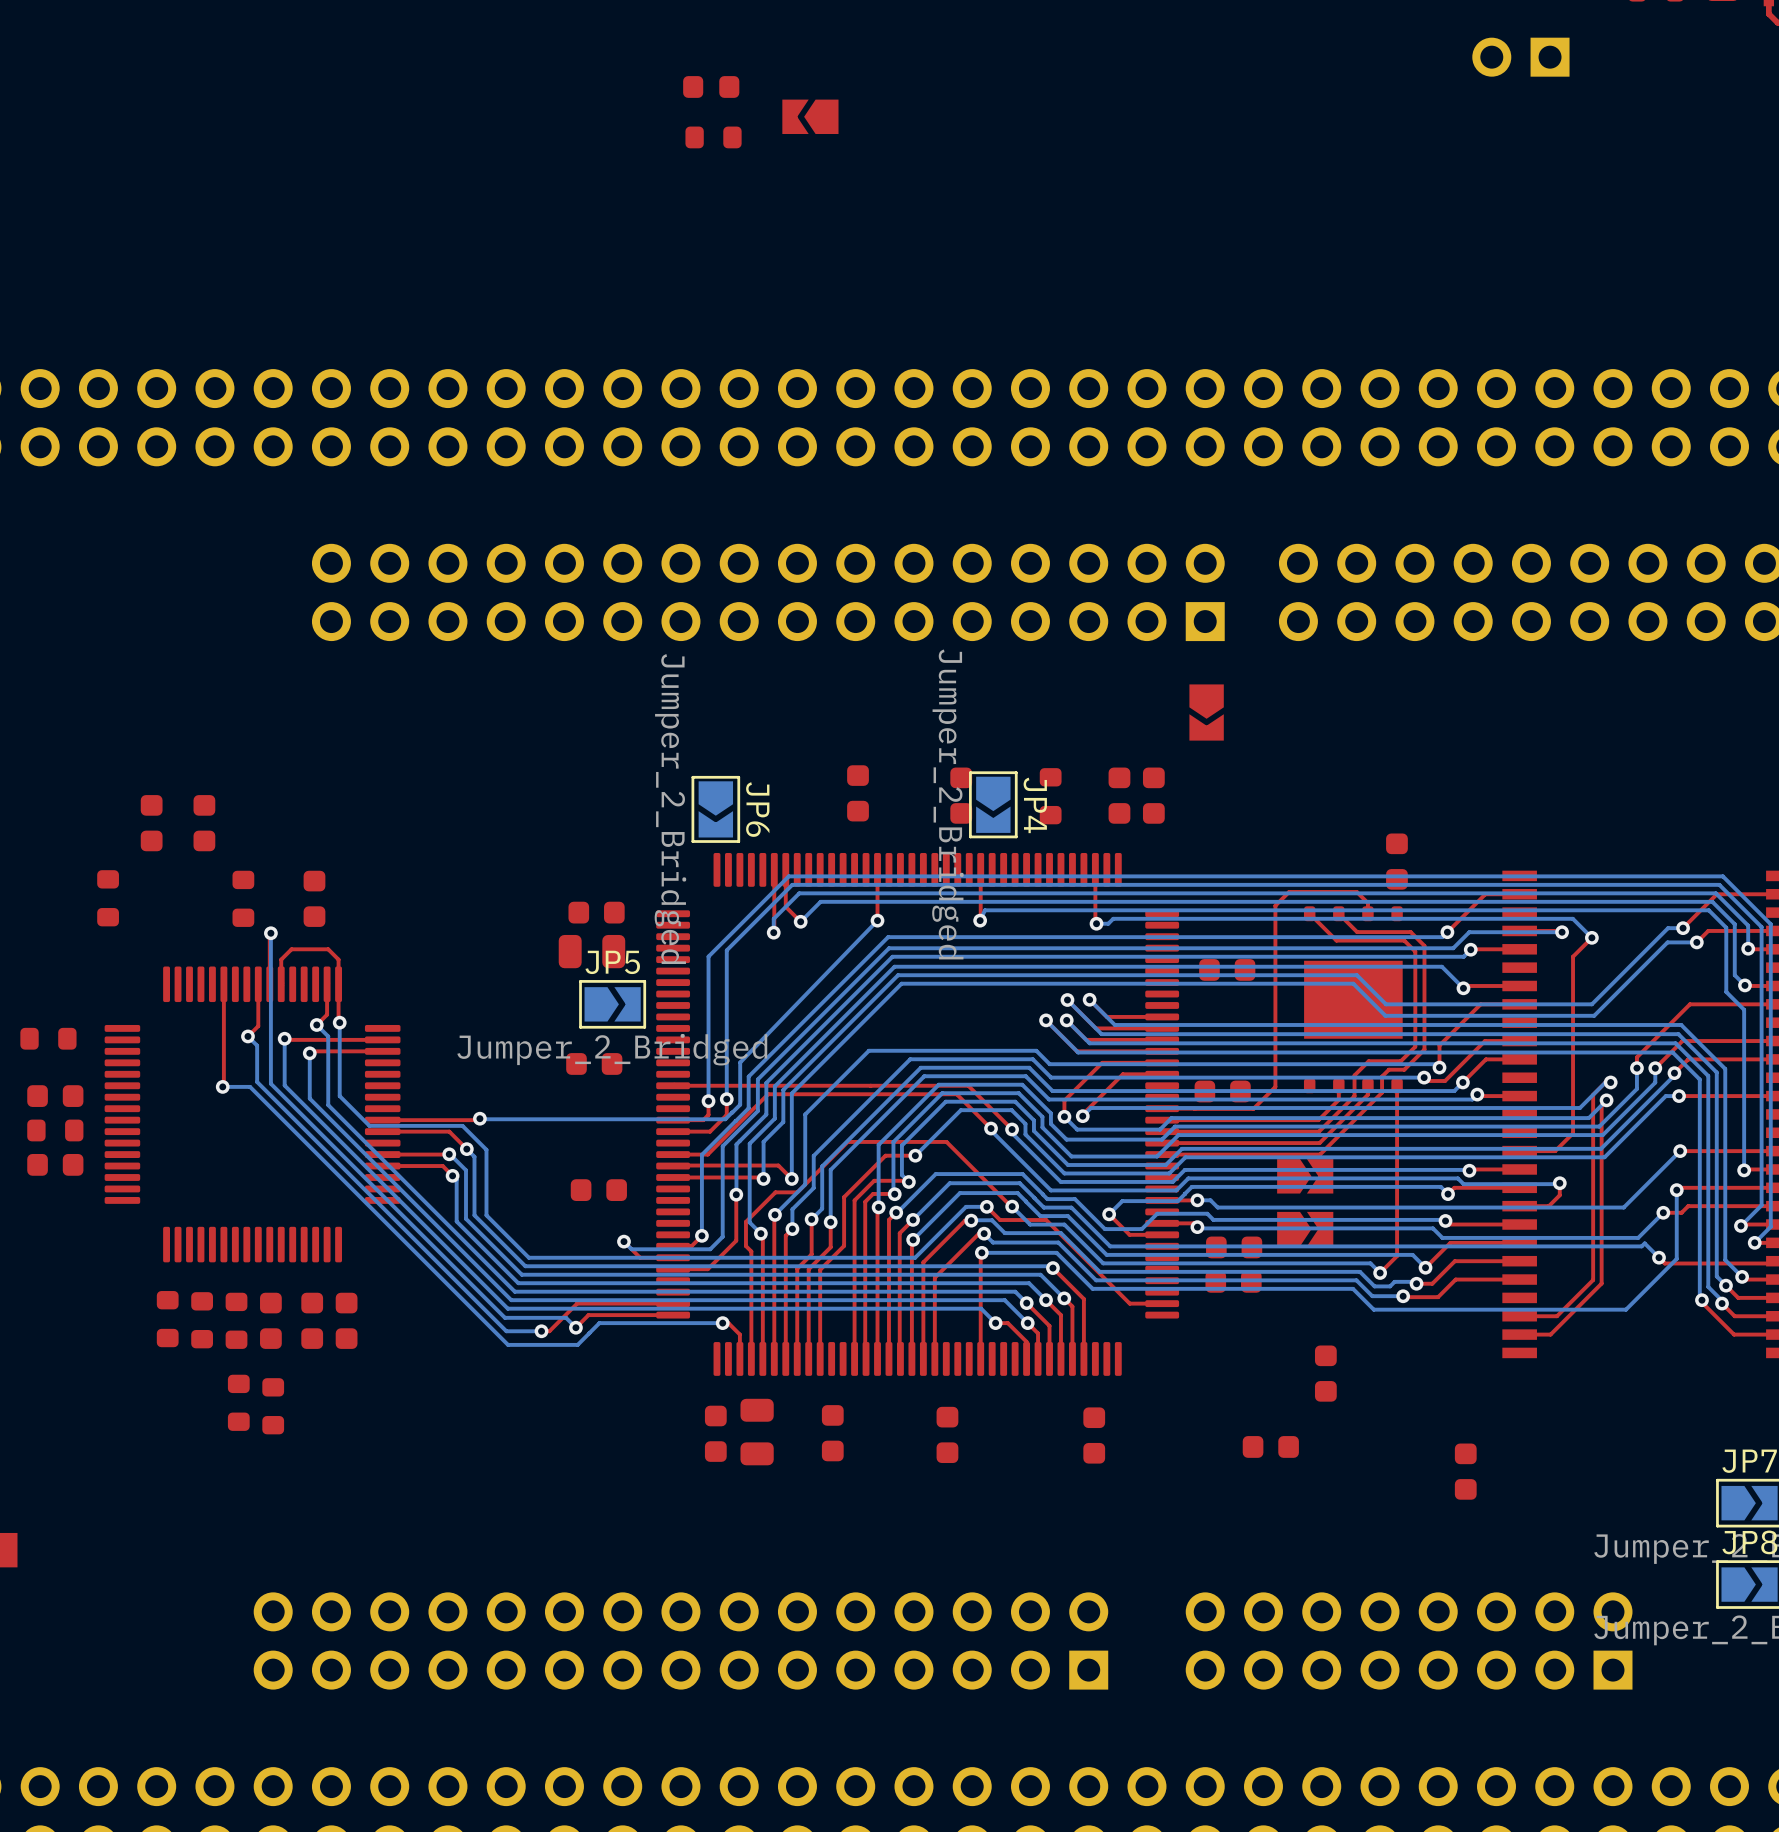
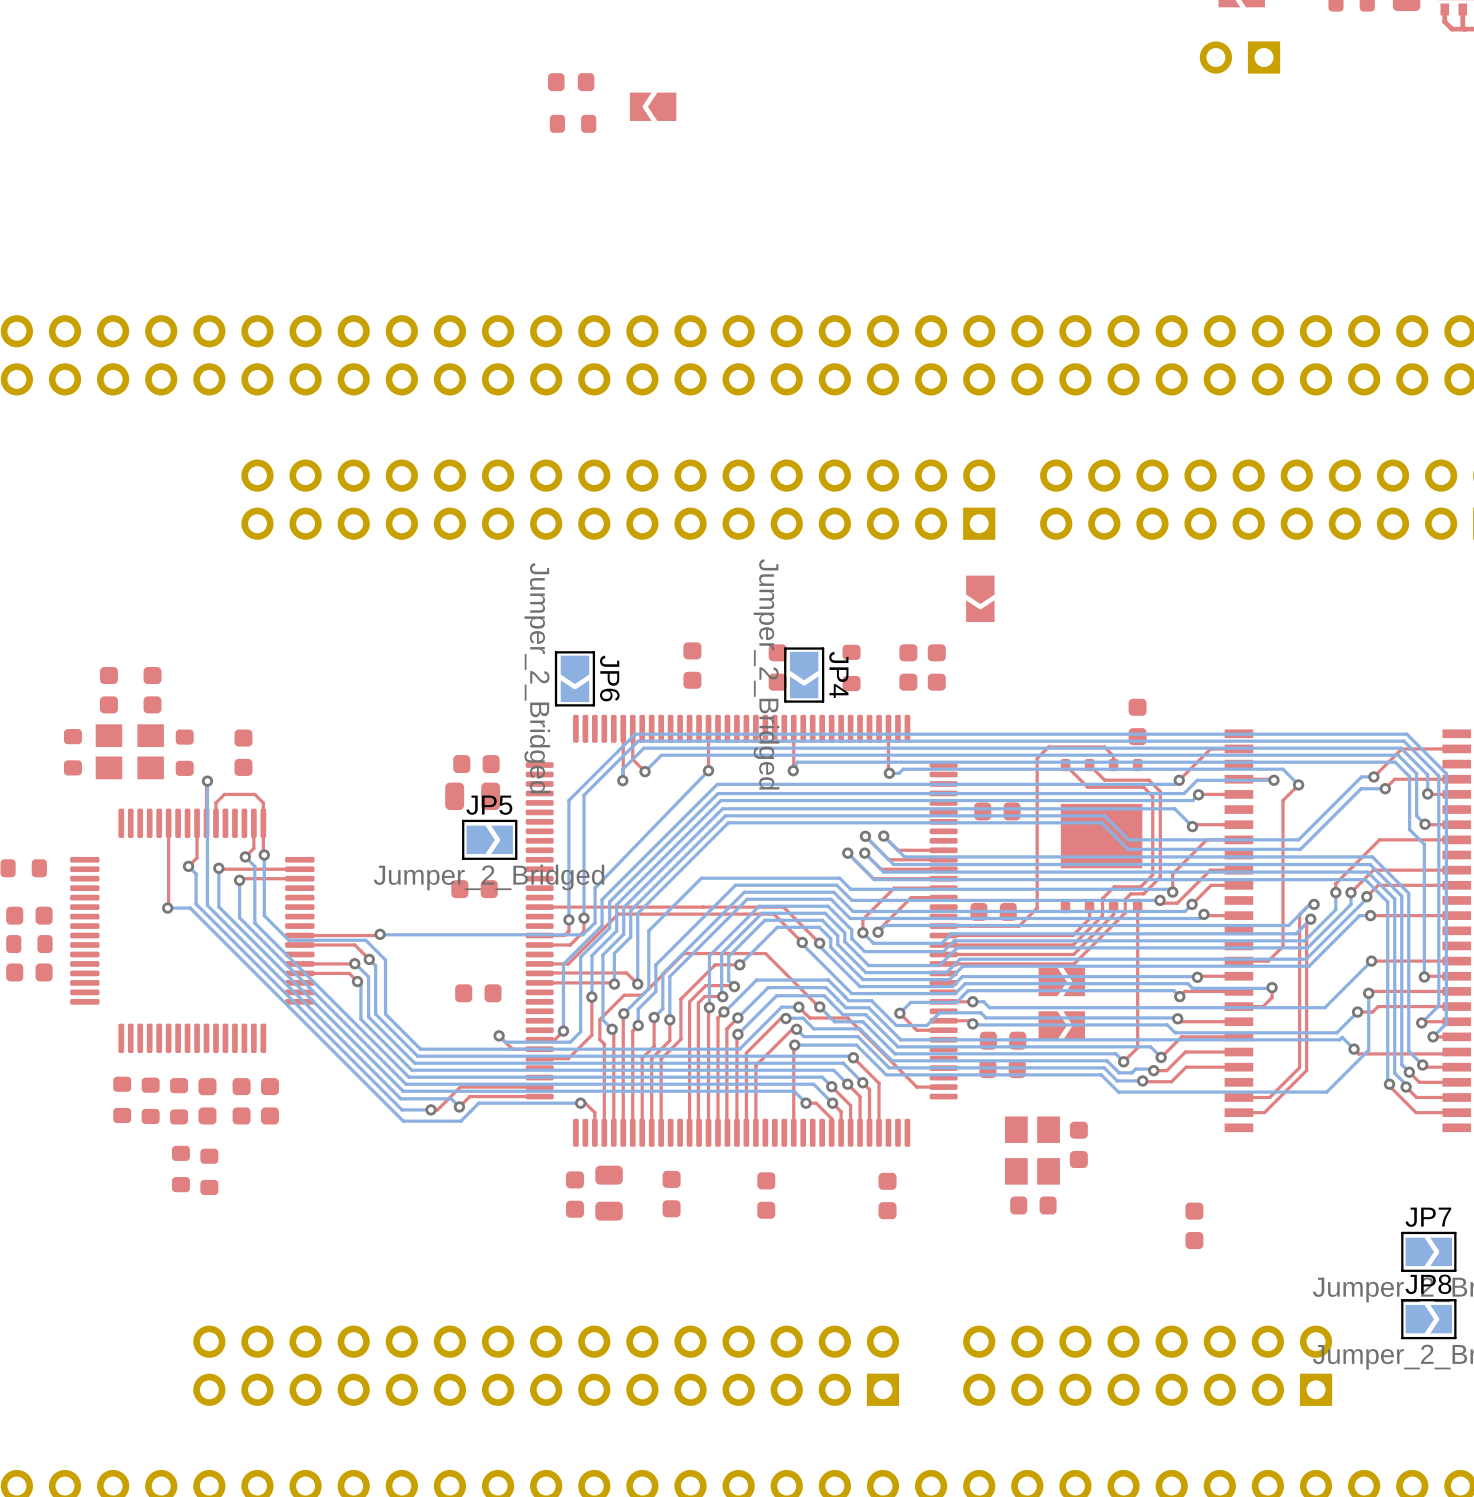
part: none -> (129, 751)
part: none -> (1032, 1150)

